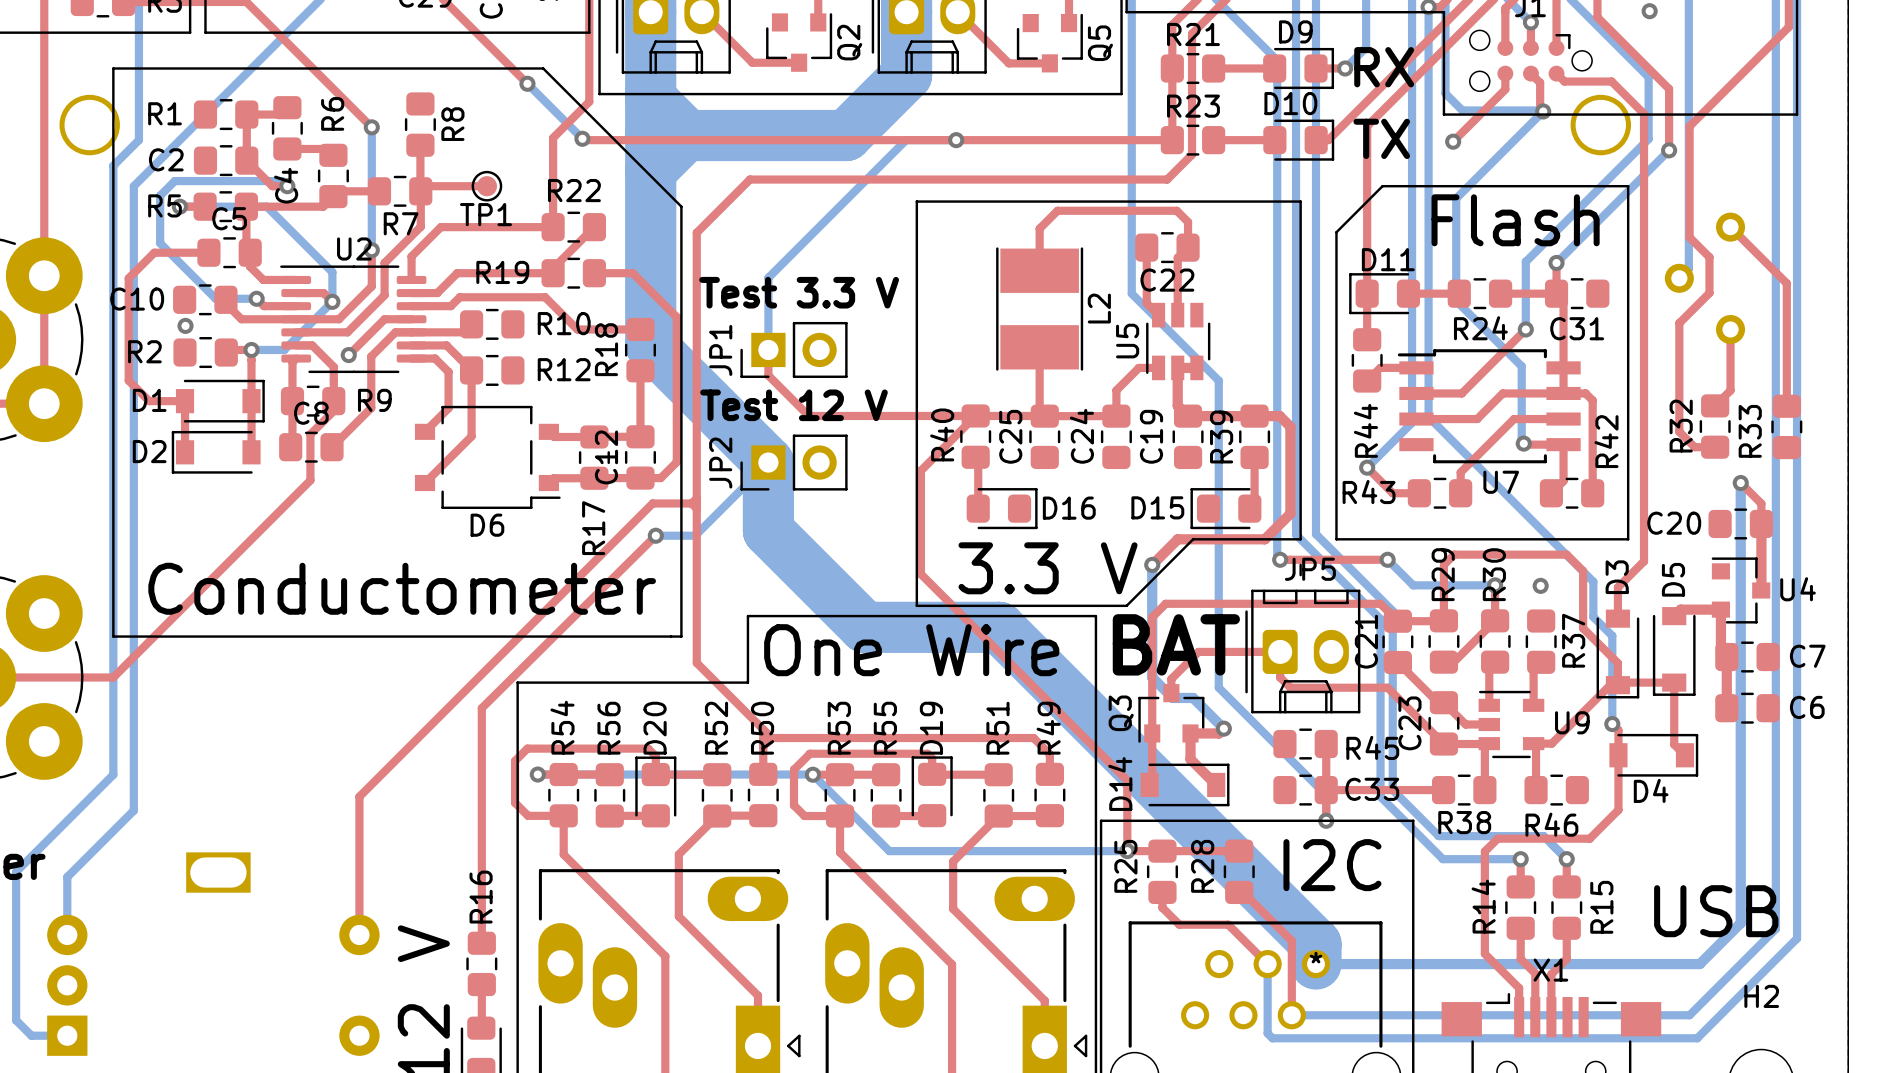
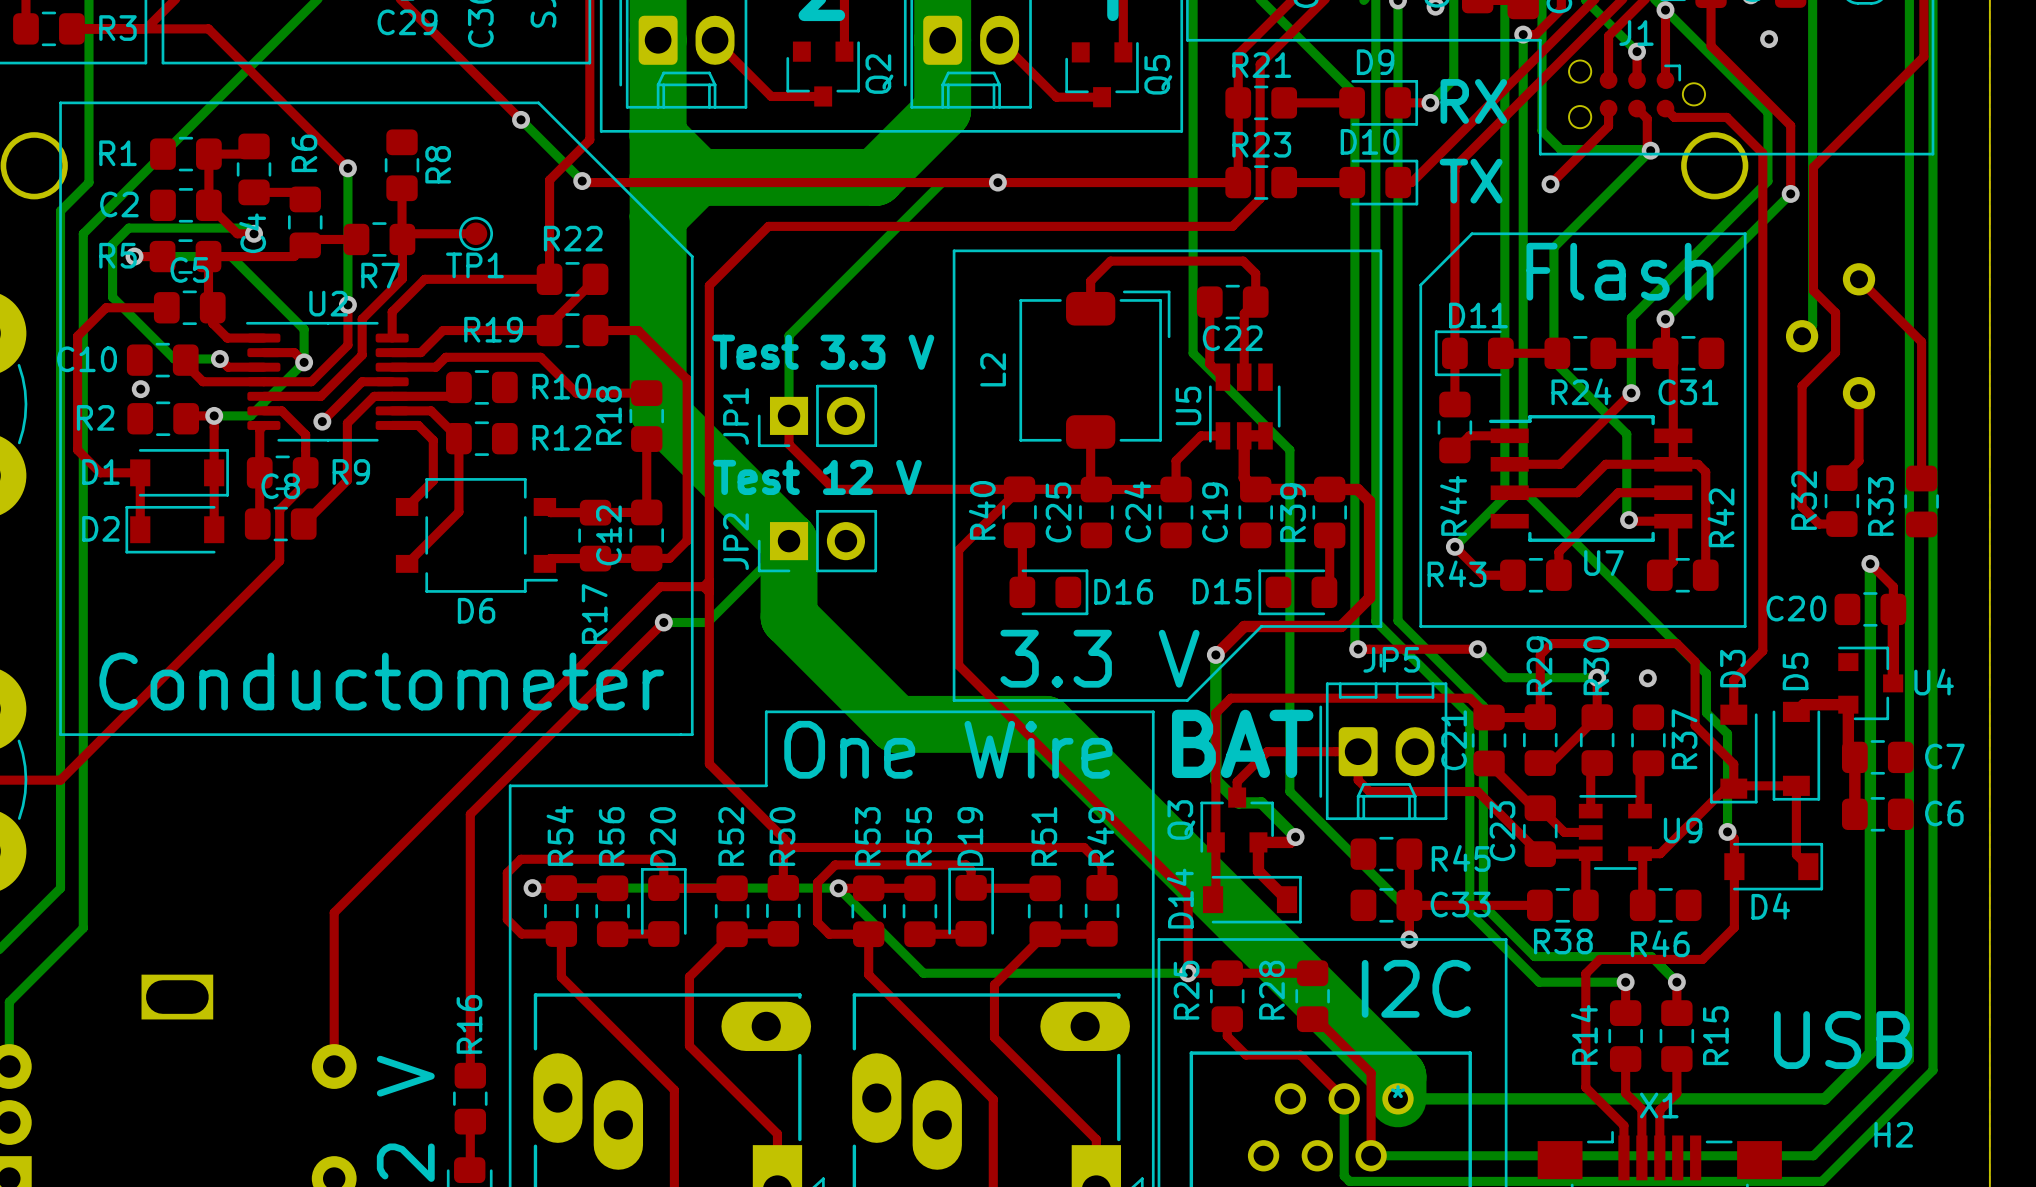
L2 footprint: [996, 247, 1084, 371] -> [1019, 290, 1171, 449]
L2 name position: L2 (1099, 308) -> L2 (993, 369)

